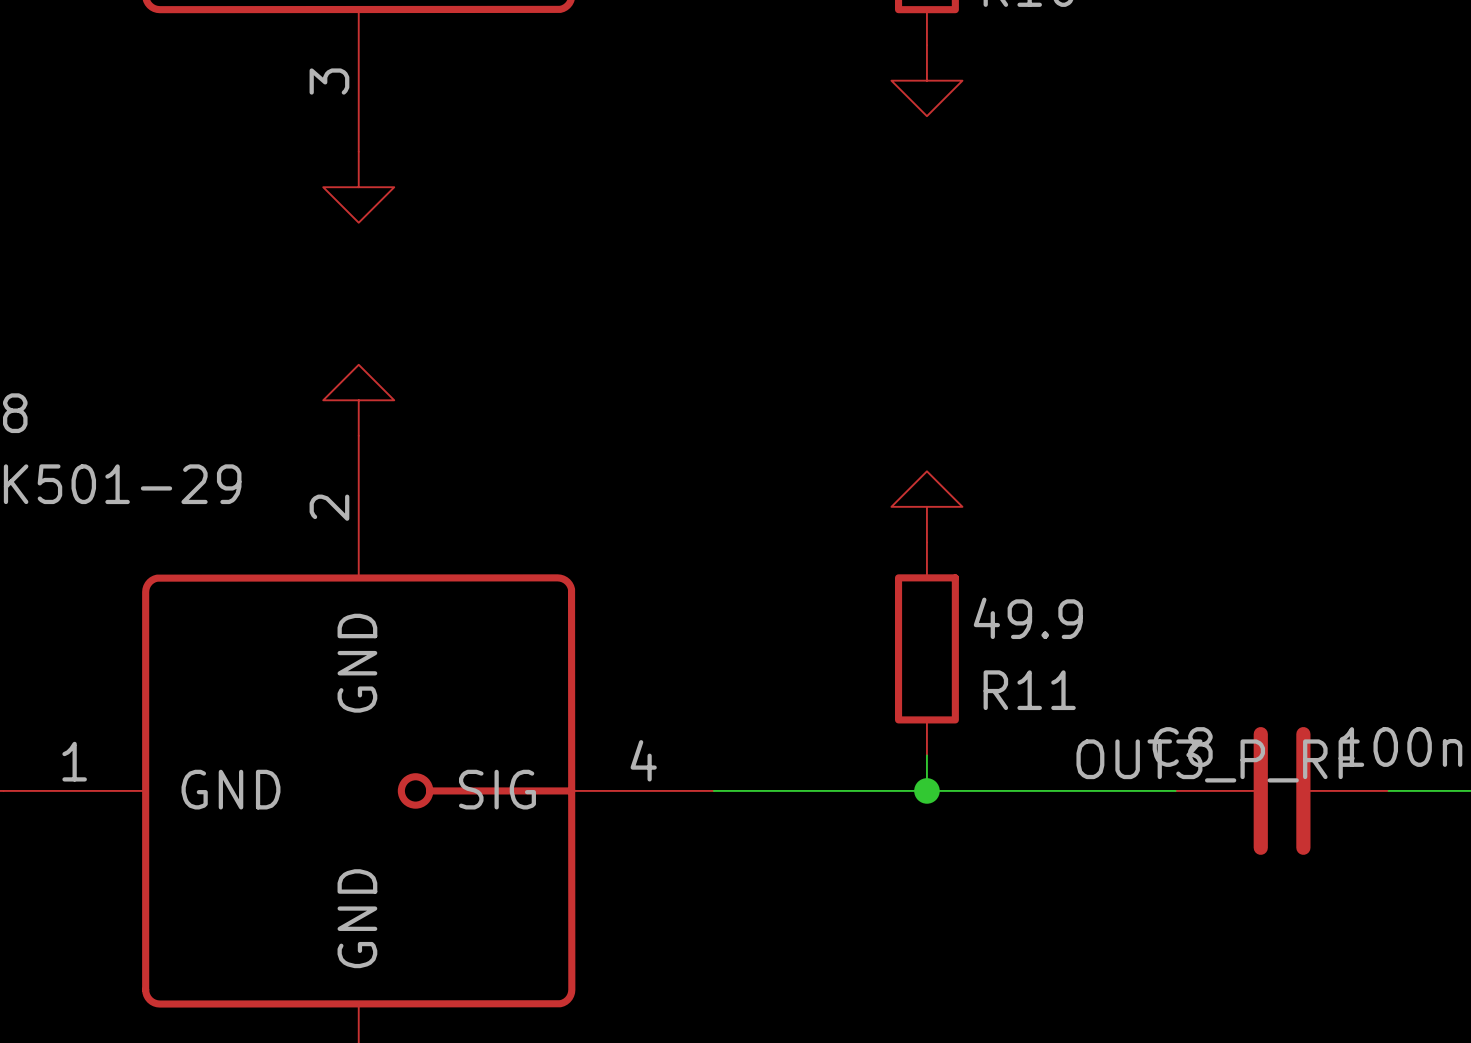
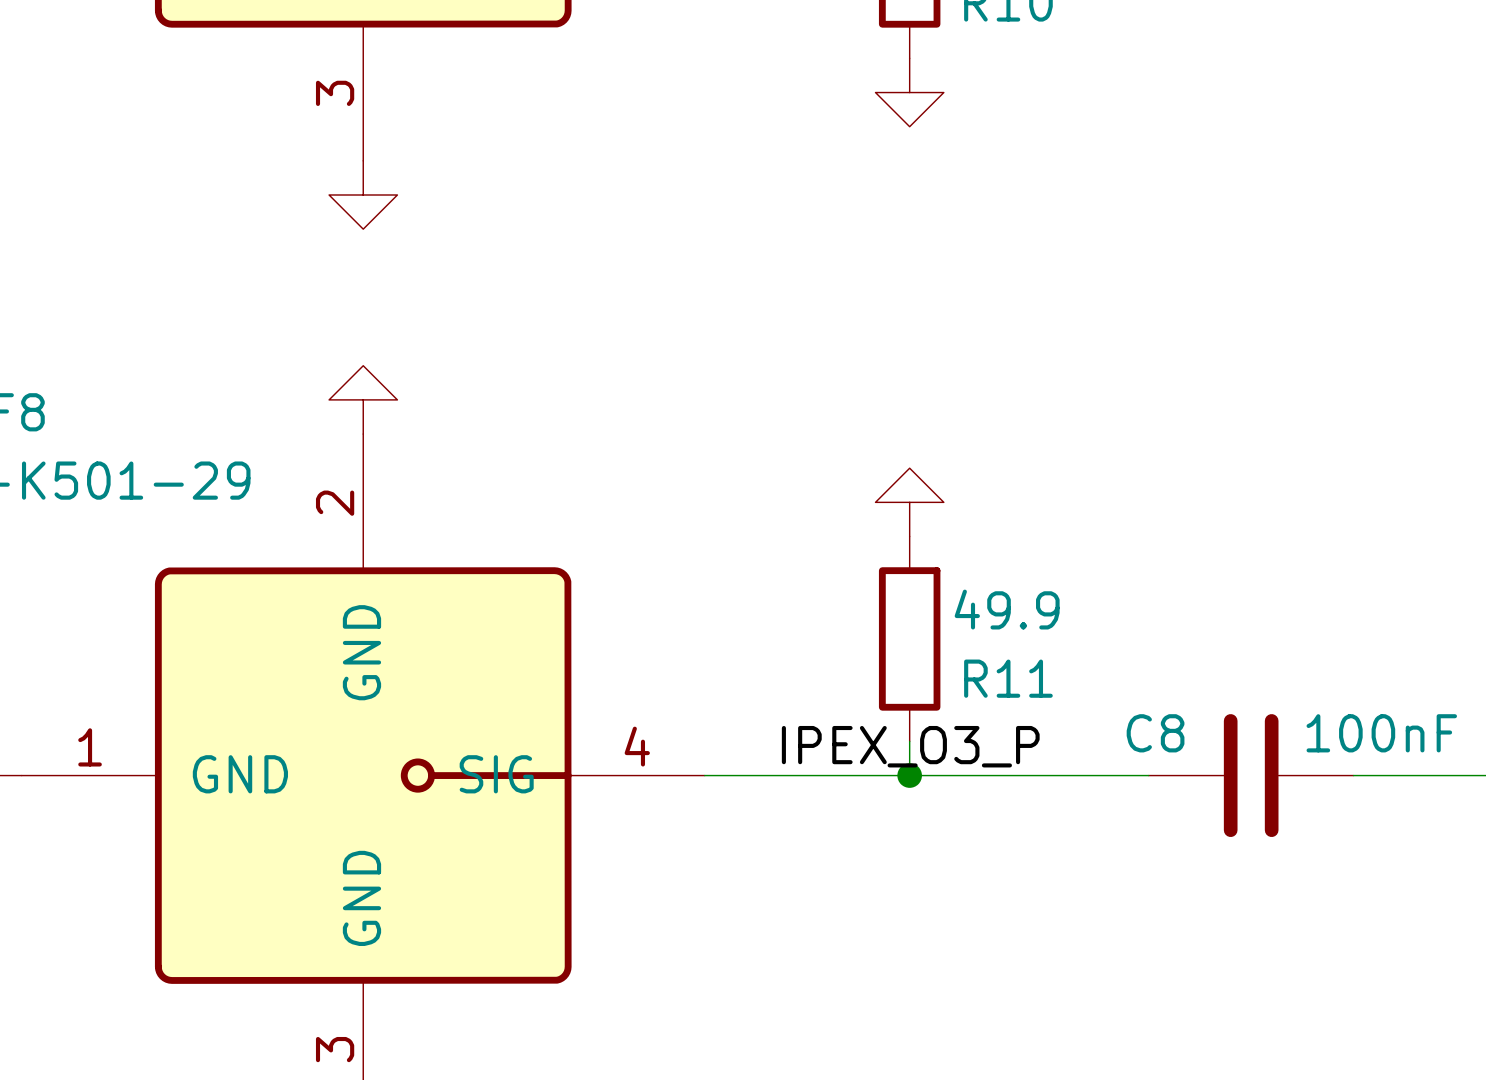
label: none -> IPEX_O3_P (910, 746)
label: OUT3_P_RF (1218, 760) -> none

